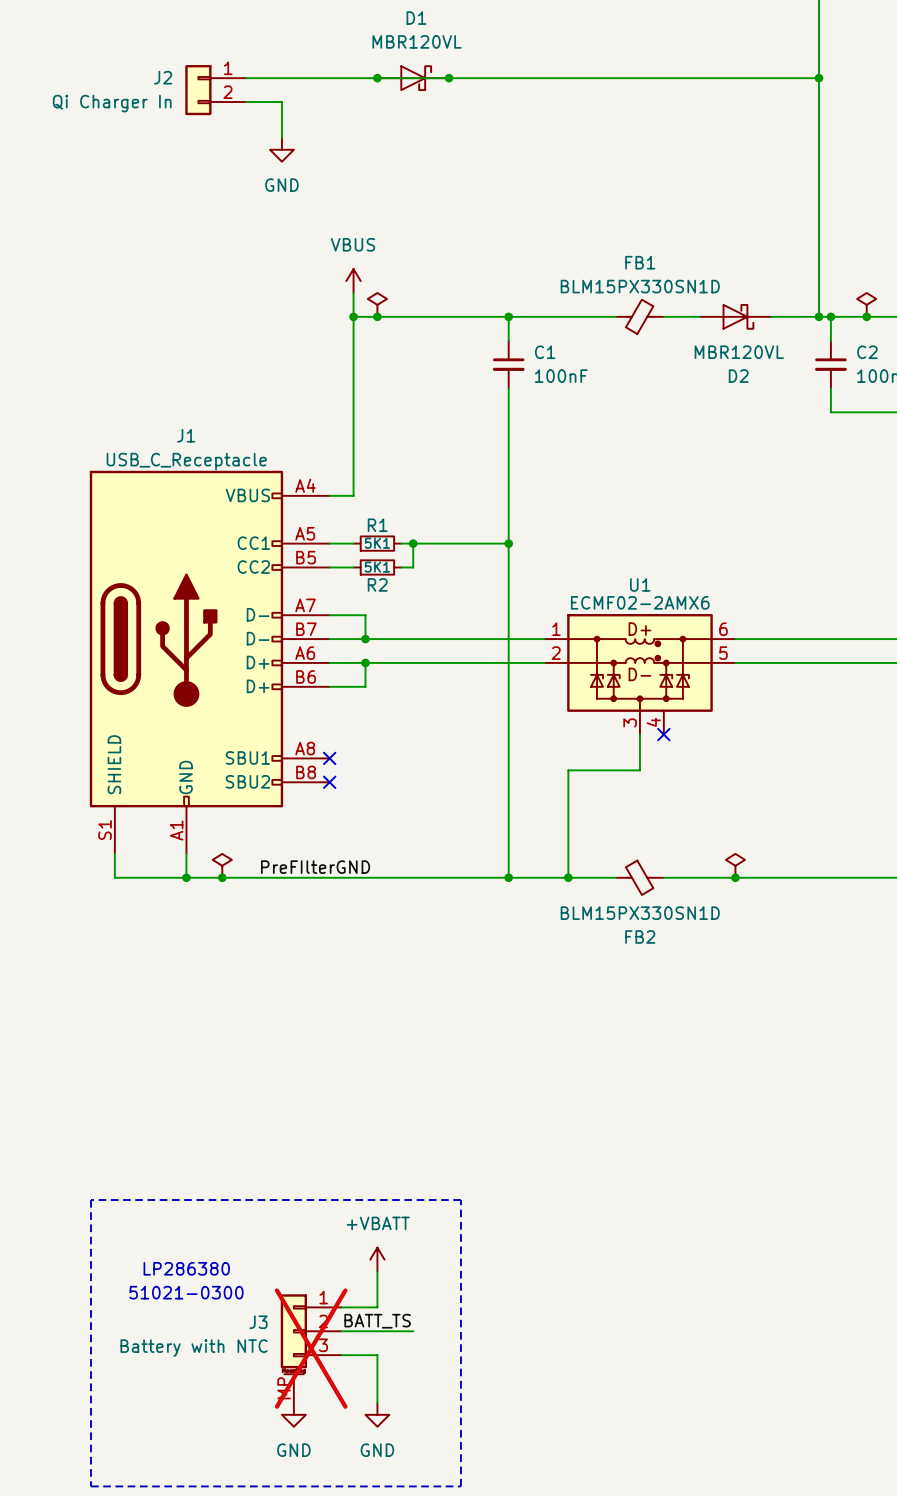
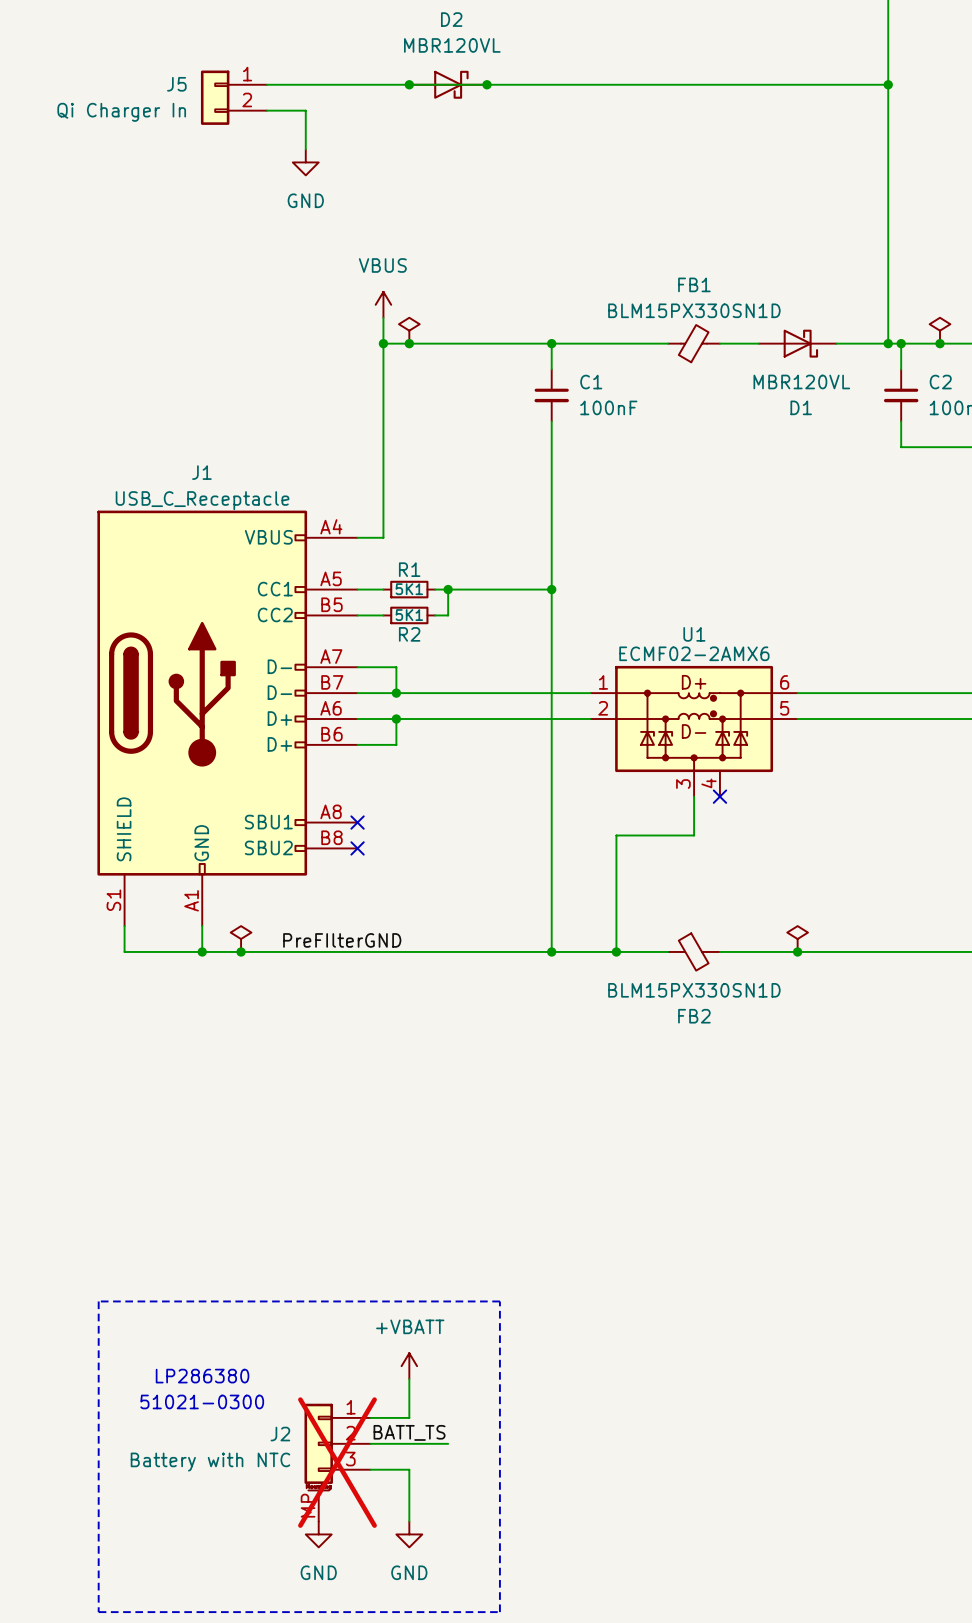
D1 name: D1 (416, 18) -> D2 (451, 19)
J2 name: J2 (163, 77) -> J5 (176, 84)
D2 name: D2 (738, 376) -> D1 (801, 407)
J3 name: J3 (258, 1322) -> J2 (280, 1434)

